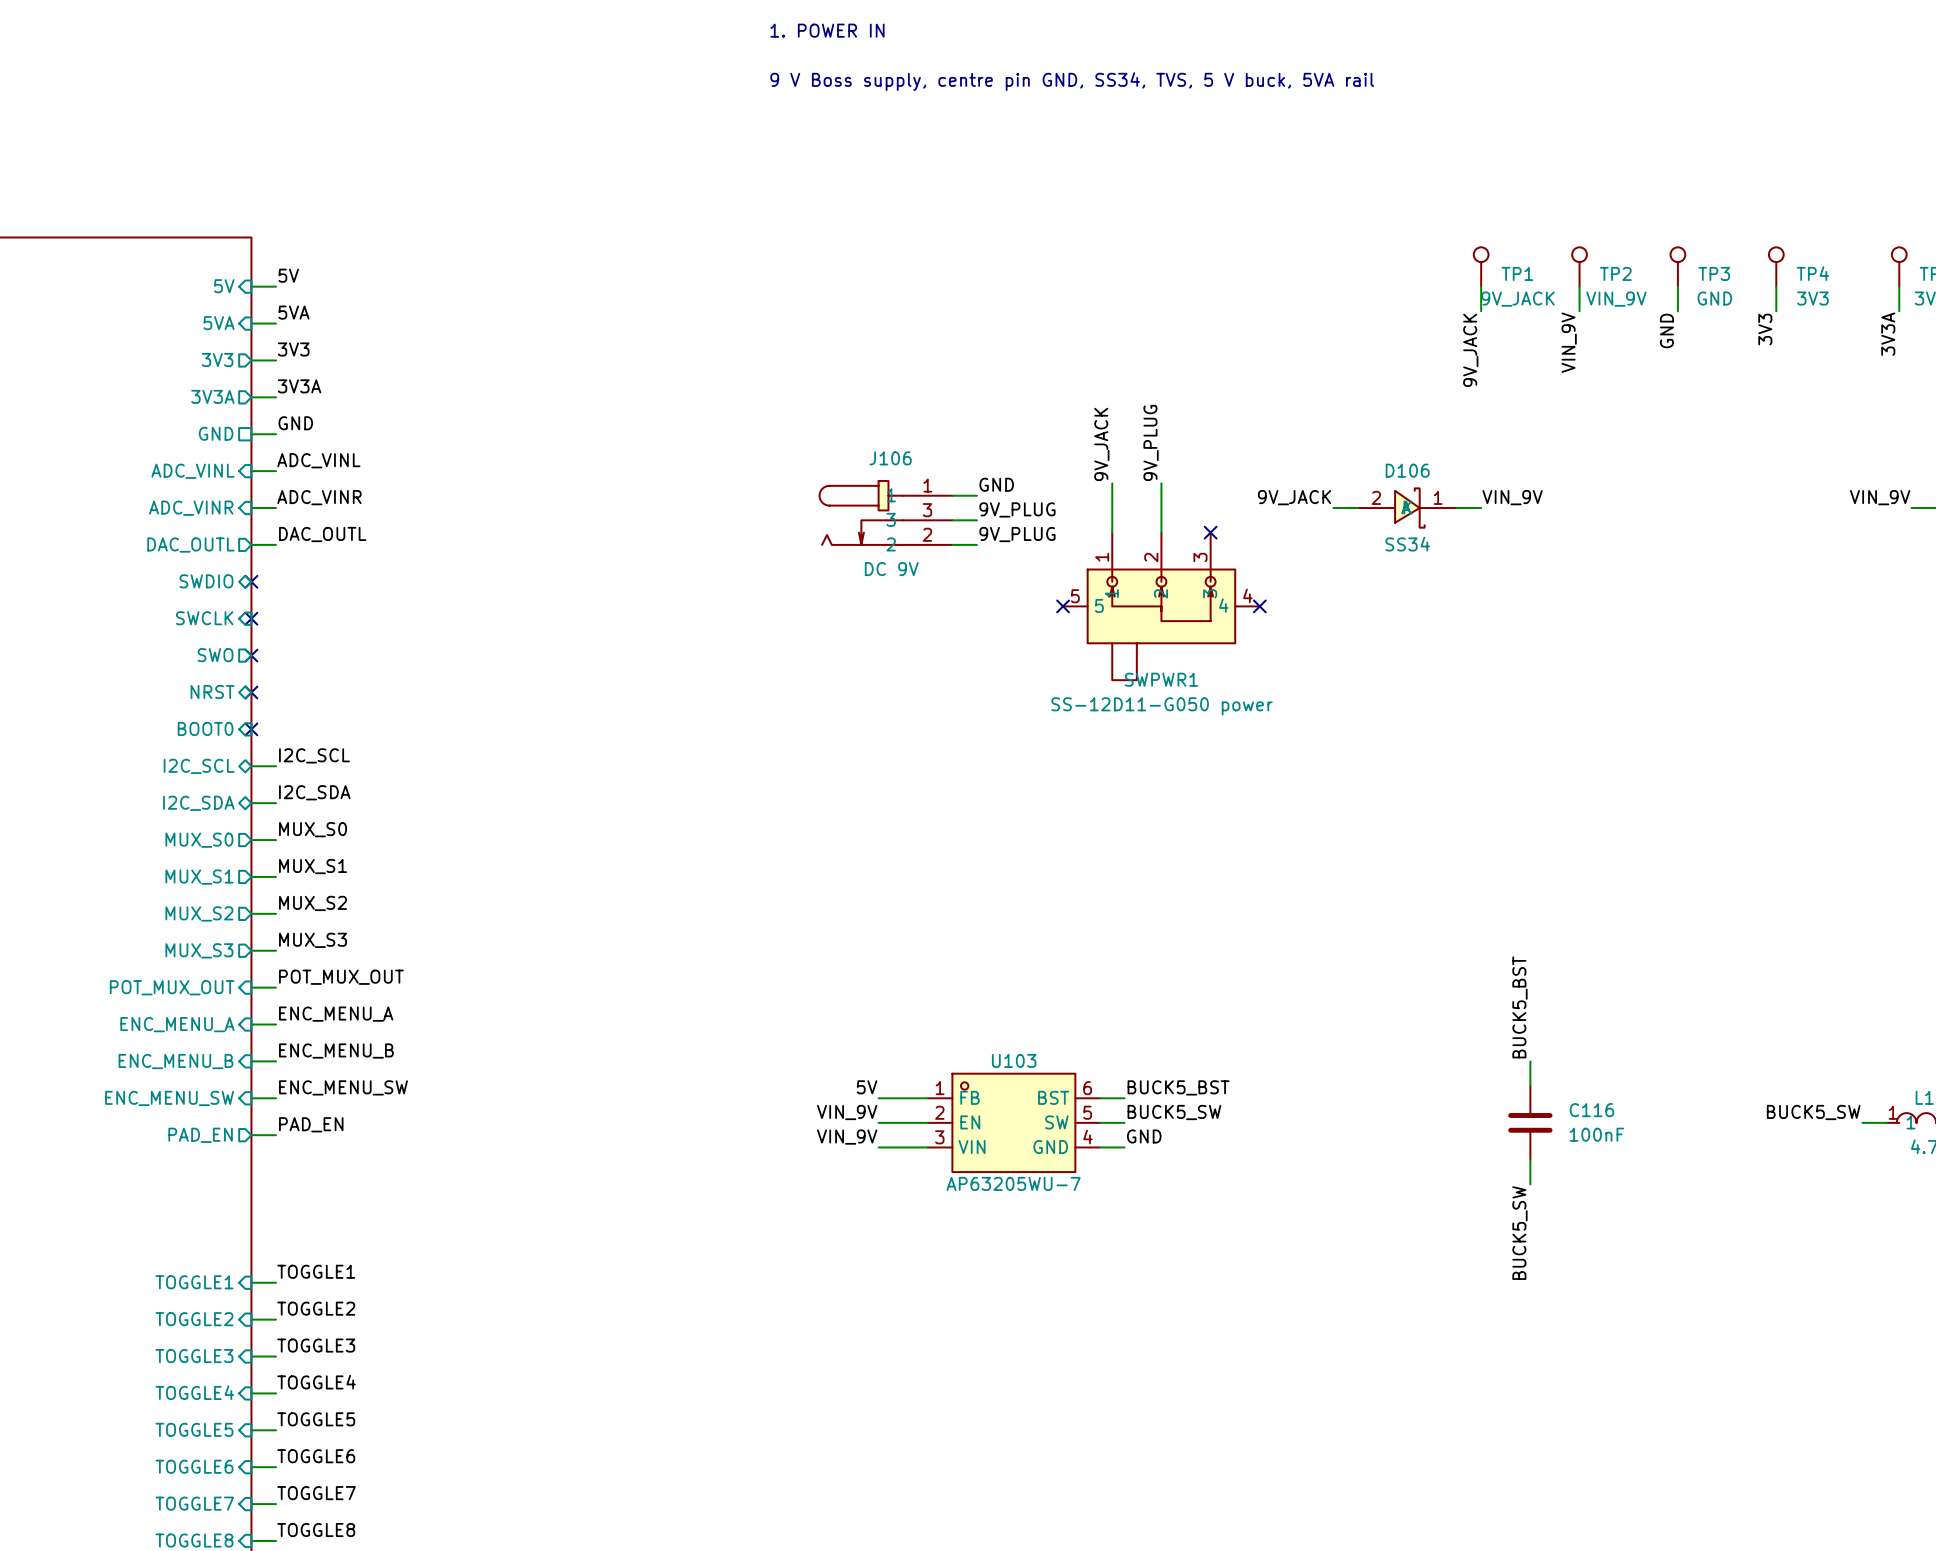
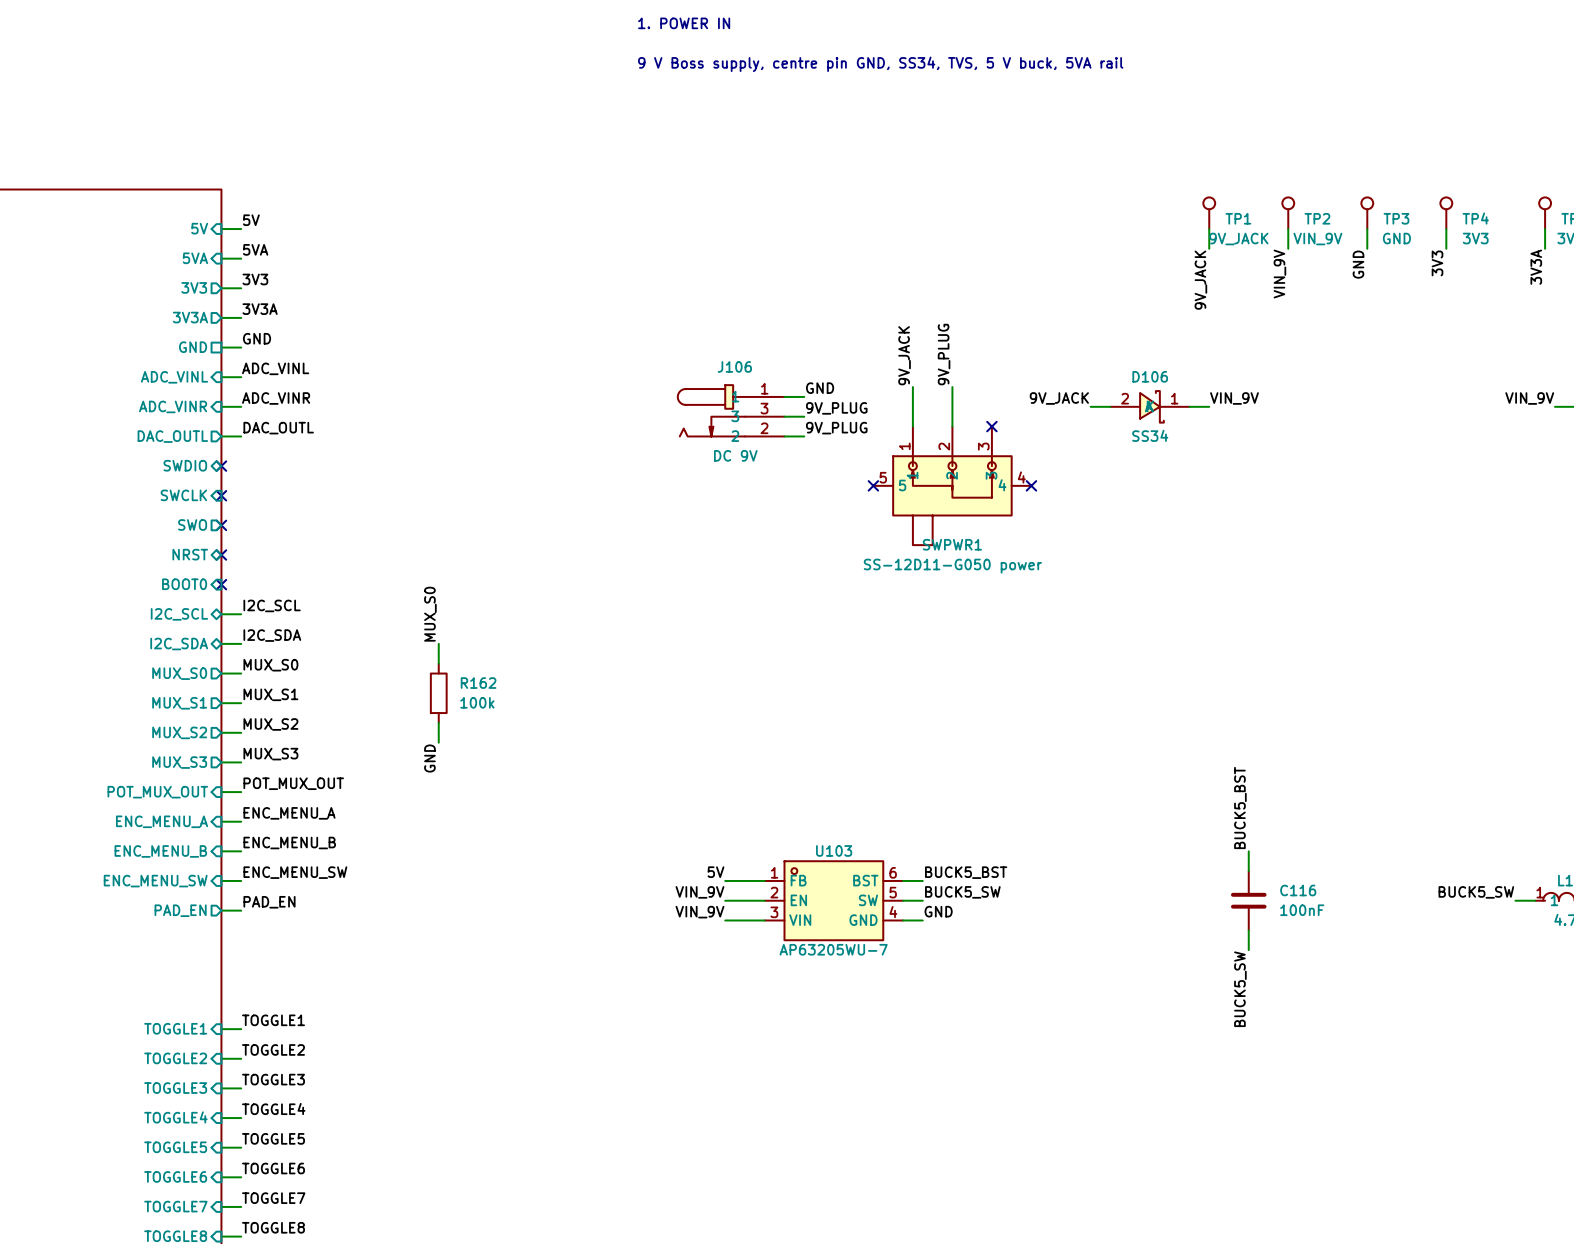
label: none -> MUX_S0 (430, 614)
wire: none -> (438, 643) (438, 663)
R162: none -> 100k (438, 693)
wire: none -> (438, 722) (438, 742)
label: none -> GND (429, 758)

